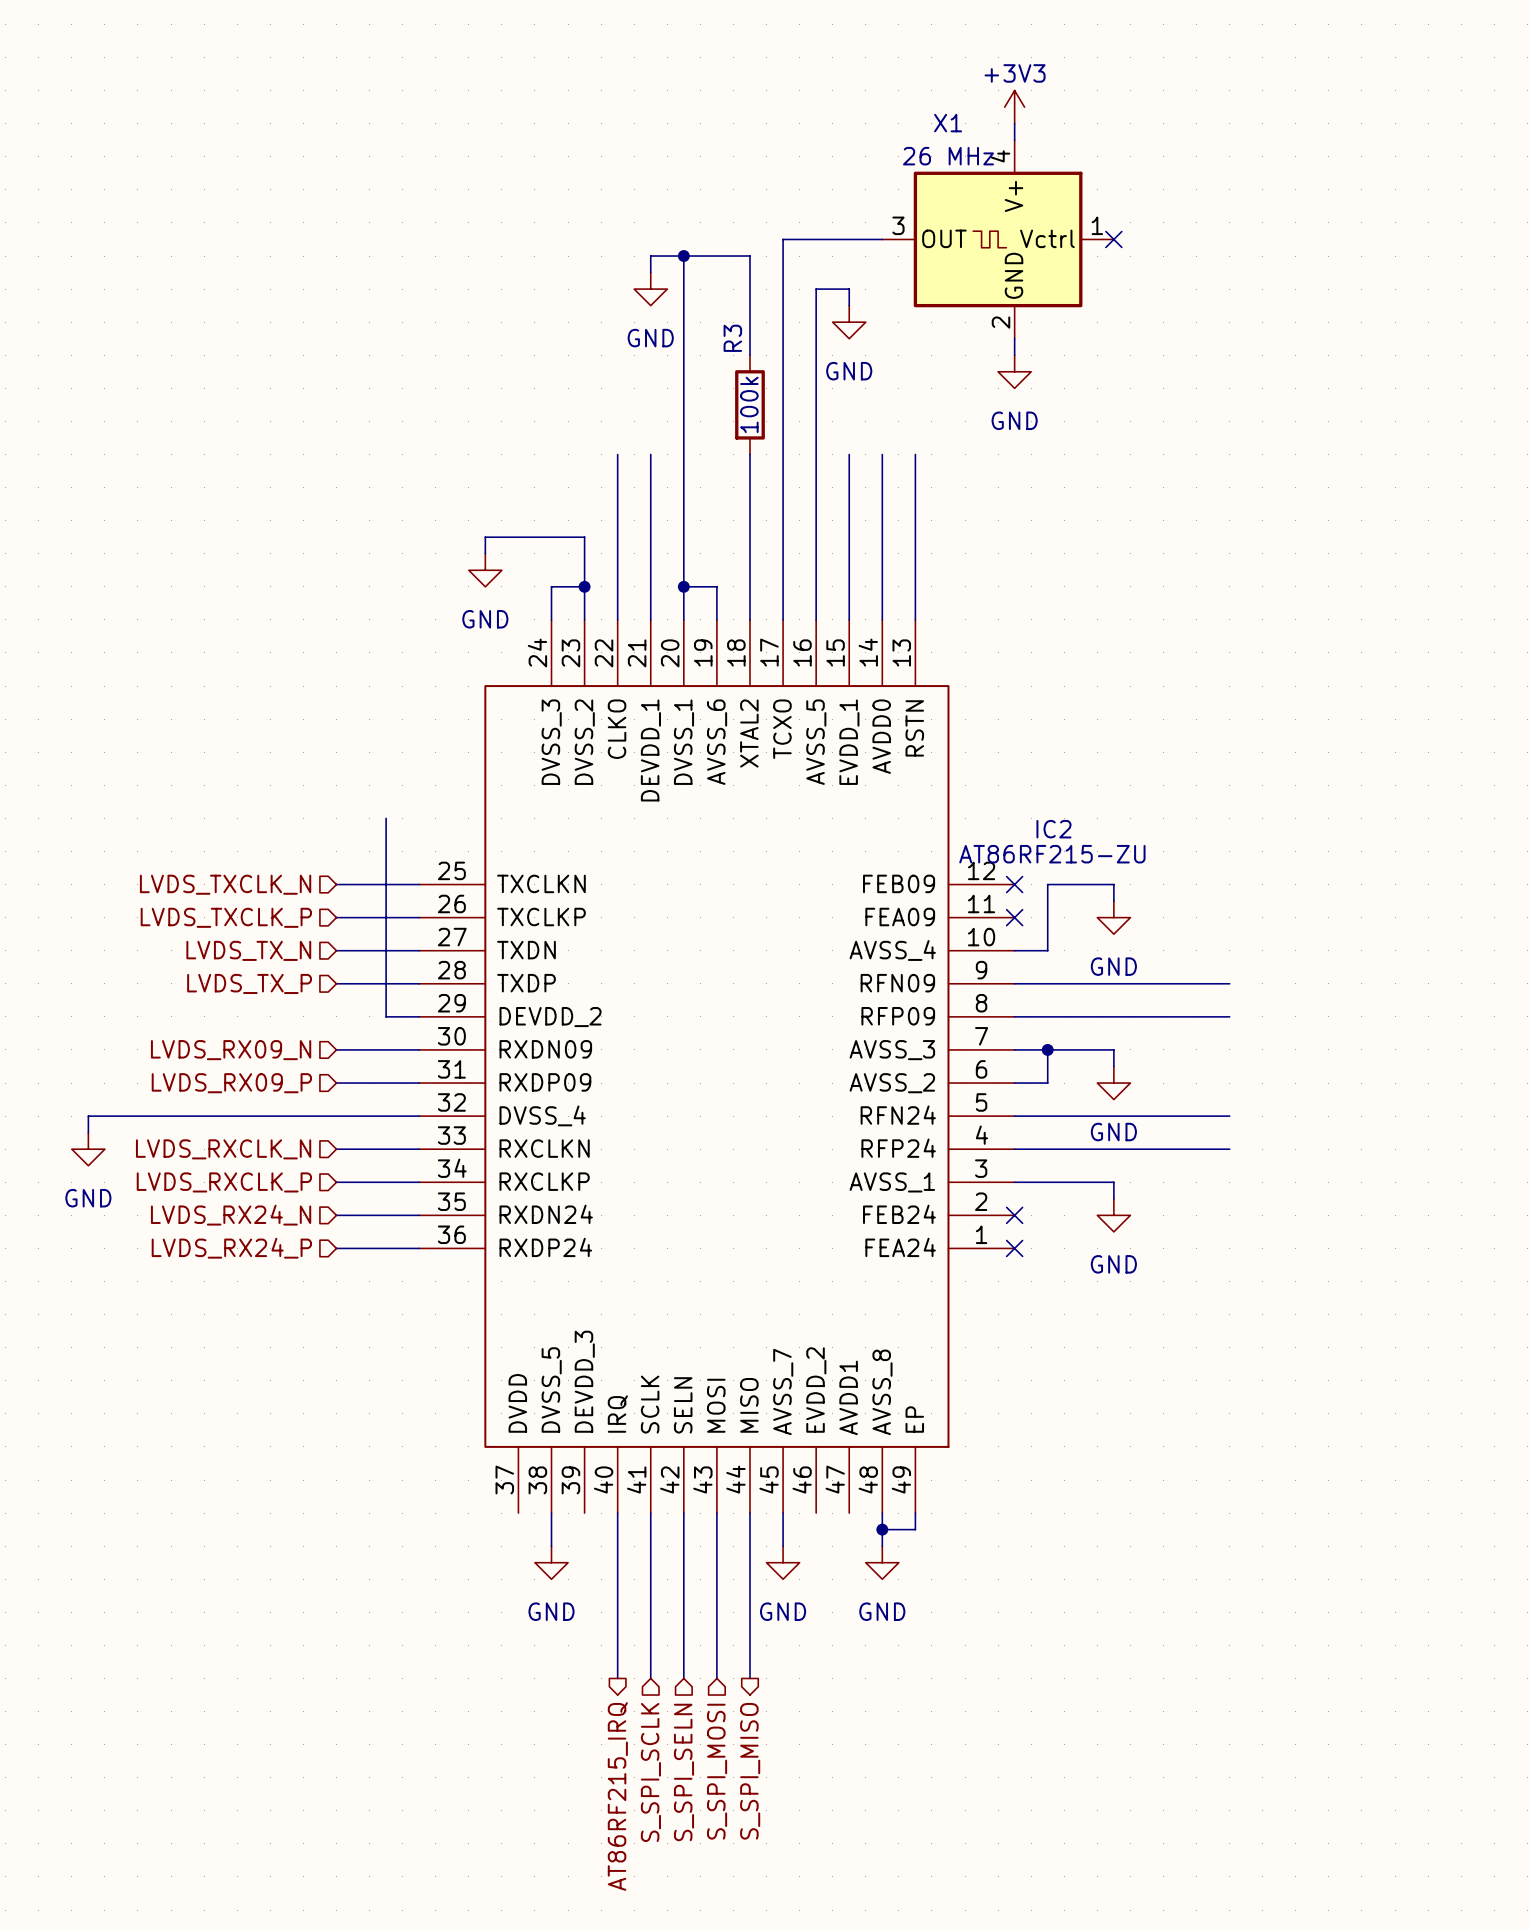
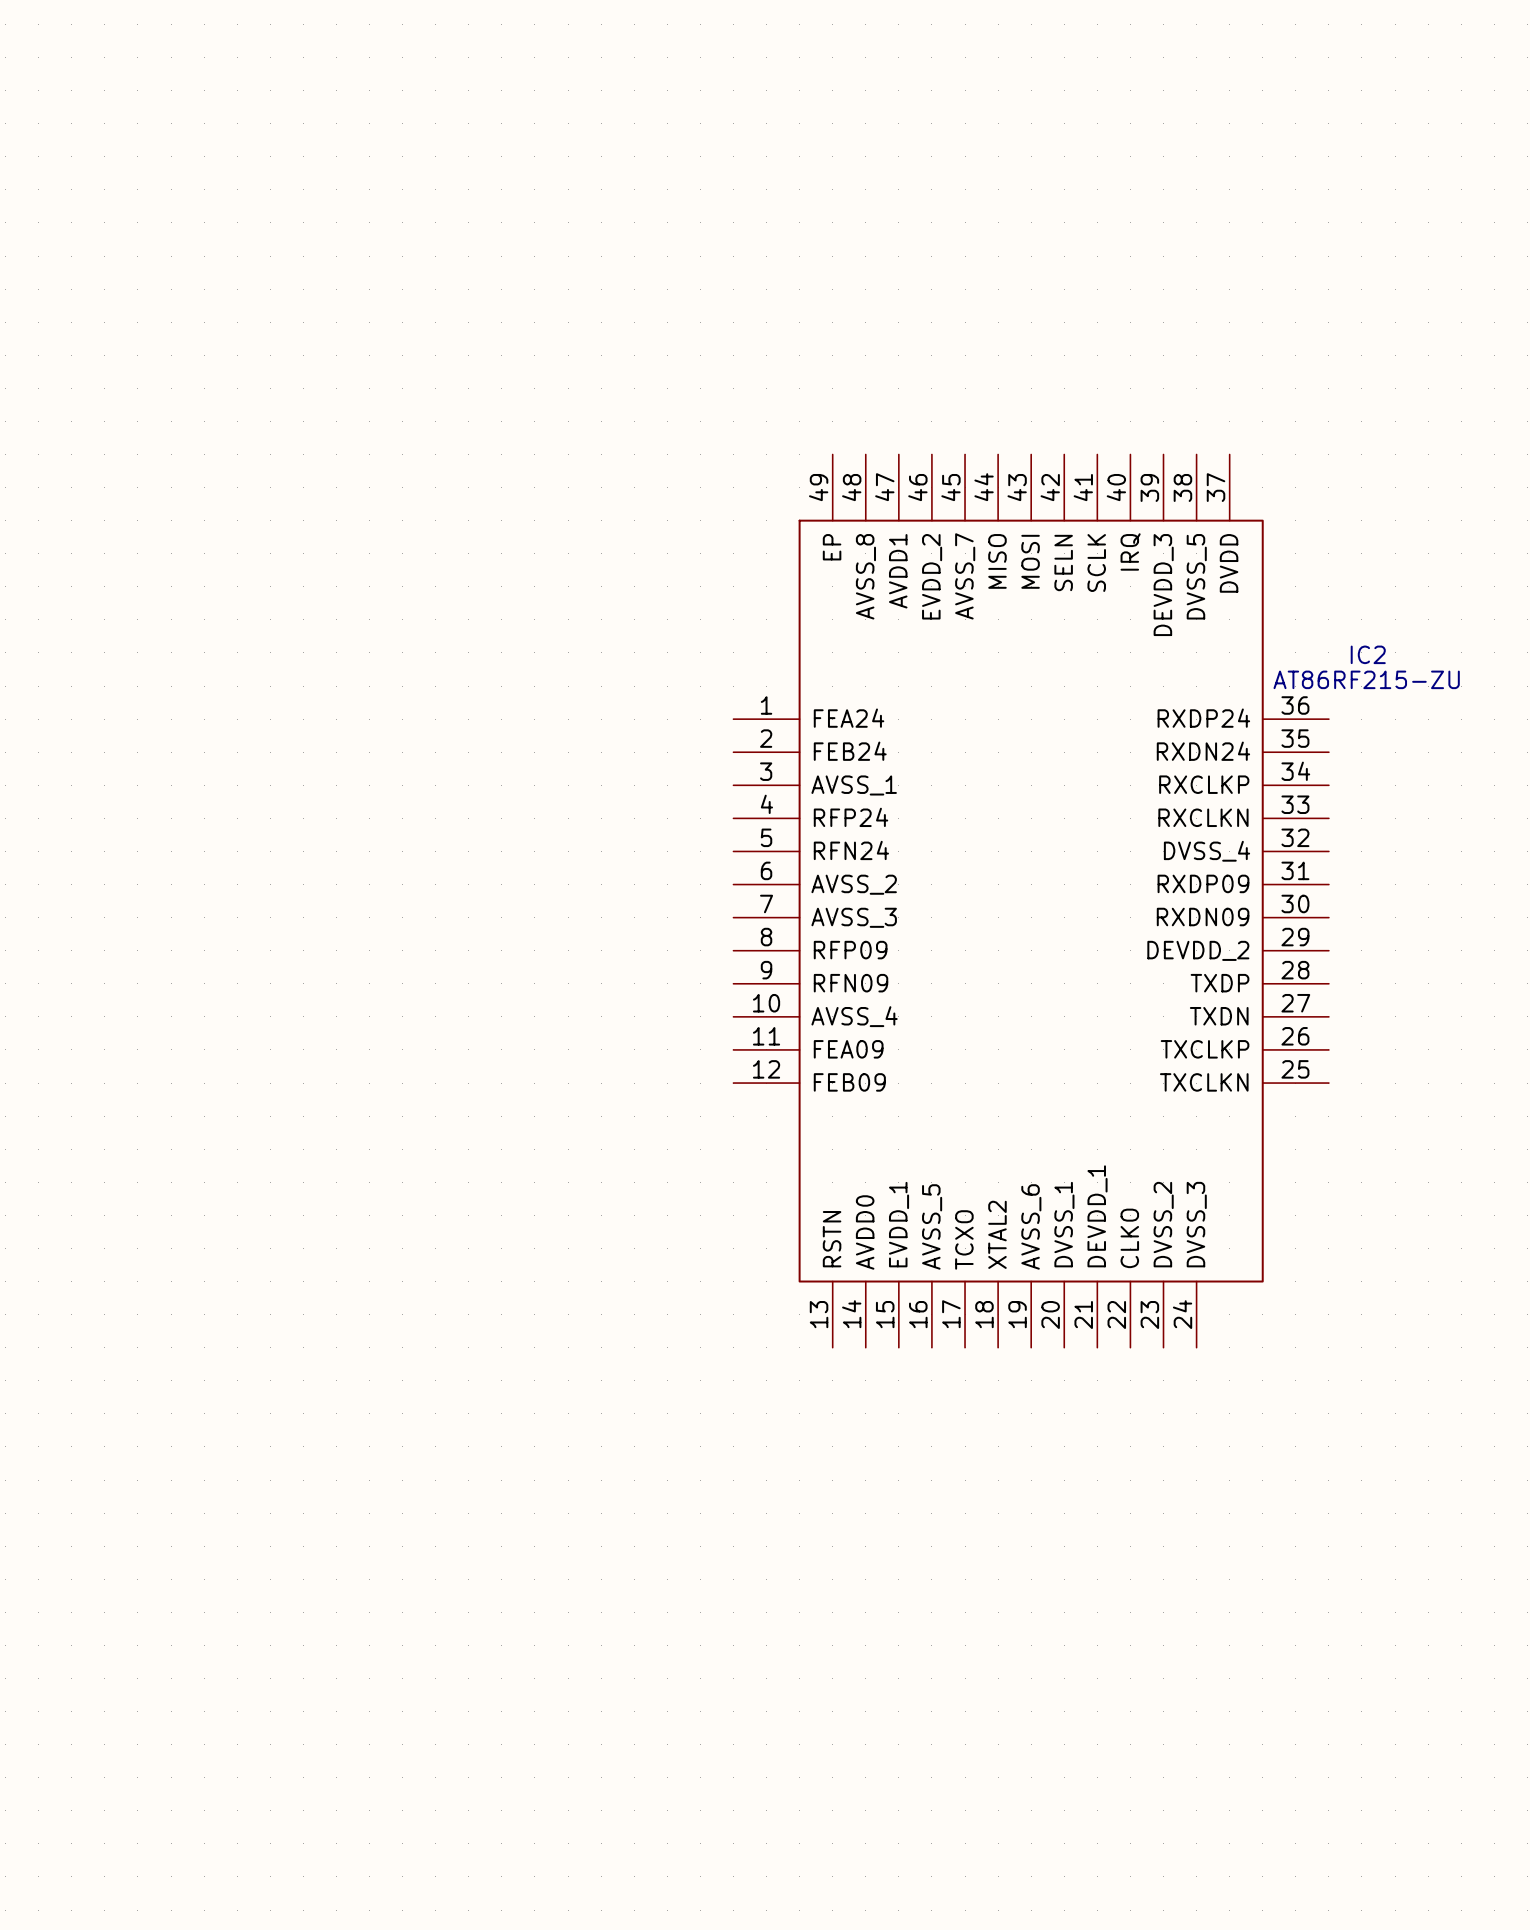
power symbol: +3V3 (1014, 107) -> none
wire: (1014, 123) (1014, 140) -> none
wire: (882, 239) (783, 239) (783, 619) -> none
X1: 26 MHz (998, 239) -> none
no-connect mark: (1113, 239) -> none
wire: (683, 256) (683, 619) -> none
junction: (683, 256) -> none
wire: (650, 272) (650, 256) (749, 256) (749, 355) -> none
power symbol: GND (650, 289) -> none
wire: (849, 305) (849, 289) (816, 289) (816, 619) -> none
power symbol: GND (849, 322) -> none
wire: (1014, 338) (1014, 355) -> none
power symbol: GND (1014, 371) -> none
R3: 100k (749, 404) -> none
wire: (617, 454) (617, 619) -> none
wire: (650, 454) (650, 619) -> none
wire: (749, 454) (749, 619) -> none
wire: (849, 454) (849, 619) -> none
wire: (882, 454) (882, 619) -> none
wire: (915, 454) (915, 619) -> none
wire: (485, 553) (485, 537) (584, 537) (584, 619) -> none
power symbol: GND (485, 570) -> none
wire: (584, 586) (551, 586) (551, 619) -> none
junction: (584, 586) -> none
wire: (683, 586) (716, 586) (716, 619) -> none
junction: (683, 586) -> none
wire: (386, 818) (386, 1016) (419, 1016) -> none
hierarchical label: LVDS_TXCLK_N (225, 884) -> none
wire: (336, 884) (419, 884) -> none
no-connect mark: (1014, 884) -> none
wire: (1113, 901) (1113, 884) (1047, 884) (1047, 950) (1014, 950) -> none
hierarchical label: LVDS_TXCLK_P (226, 917) -> none
wire: (336, 917) (419, 917) -> none
no-connect mark: (1014, 917) -> none
power symbol: GND (1113, 917) -> none
hierarchical label: LVDS_TX_N (248, 950) -> none
wire: (336, 950) (419, 950) -> none
hierarchical label: LVDS_TX_P (249, 983) -> none
wire: (336, 983) (419, 983) -> none
wire: (1014, 983) (1229, 983) -> none
wire: (1014, 1016) (1229, 1016) -> none
wire: (336, 1049) (419, 1049) -> none
wire: (1014, 1049) (1113, 1049) (1113, 1066) -> none
wire: (1047, 1049) (1047, 1083) (1014, 1083) -> none
junction: (1047, 1049) -> none
hierarchical label: LVDS_RX09_N (231, 1050) -> none
IC2 rotation: 0° (716, 1066) -> 180° (1031, 901)
hierarchical label: LVDS_RX09_P (231, 1083) -> none
wire: (336, 1083) (419, 1083) -> none
power symbol: GND (1113, 1083) -> none
wire: (419, 1116) (88, 1116) (88, 1132) -> none
wire: (1014, 1116) (1229, 1116) -> none
power symbol: GND (88, 1149) -> none
hierarchical label: LVDS_RXCLK_N (223, 1149) -> none
wire: (336, 1149) (419, 1149) -> none
wire: (1014, 1149) (1229, 1149) -> none
hierarchical label: LVDS_RXCLK_P (224, 1182) -> none
wire: (336, 1182) (419, 1182) -> none
wire: (1014, 1182) (1113, 1182) (1113, 1198) -> none
hierarchical label: LVDS_RX24_N (231, 1215) -> none
wire: (336, 1215) (419, 1215) -> none
no-connect mark: (1014, 1215) -> none
power symbol: GND (1113, 1215) -> none
hierarchical label: LVDS_RX24_P (231, 1248) -> none
wire: (336, 1248) (419, 1248) -> none
no-connect mark: (1014, 1248) -> none
wire: (551, 1513) (551, 1546) -> none
wire: (617, 1513) (617, 1678) -> none
wire: (650, 1513) (650, 1678) -> none
wire: (683, 1513) (683, 1678) -> none
wire: (716, 1513) (716, 1678) -> none
wire: (749, 1513) (749, 1678) -> none
wire: (783, 1513) (783, 1546) -> none
wire: (882, 1513) (882, 1546) -> none
wire: (915, 1513) (915, 1529) (882, 1529) -> none
junction: (882, 1529) -> none
power symbol: GND (551, 1562) -> none
power symbol: GND (783, 1562) -> none
power symbol: GND (882, 1562) -> none
hierarchical label: S_SPI_MOSI (717, 1771) -> none
hierarchical label: S_SPI_MISO (750, 1771) -> none
hierarchical label: S_SPI_SCLK (650, 1772) -> none
hierarchical label: S_SPI_SELN (684, 1772) -> none
hierarchical label: AT86RF215_IRQ (617, 1796) -> none

